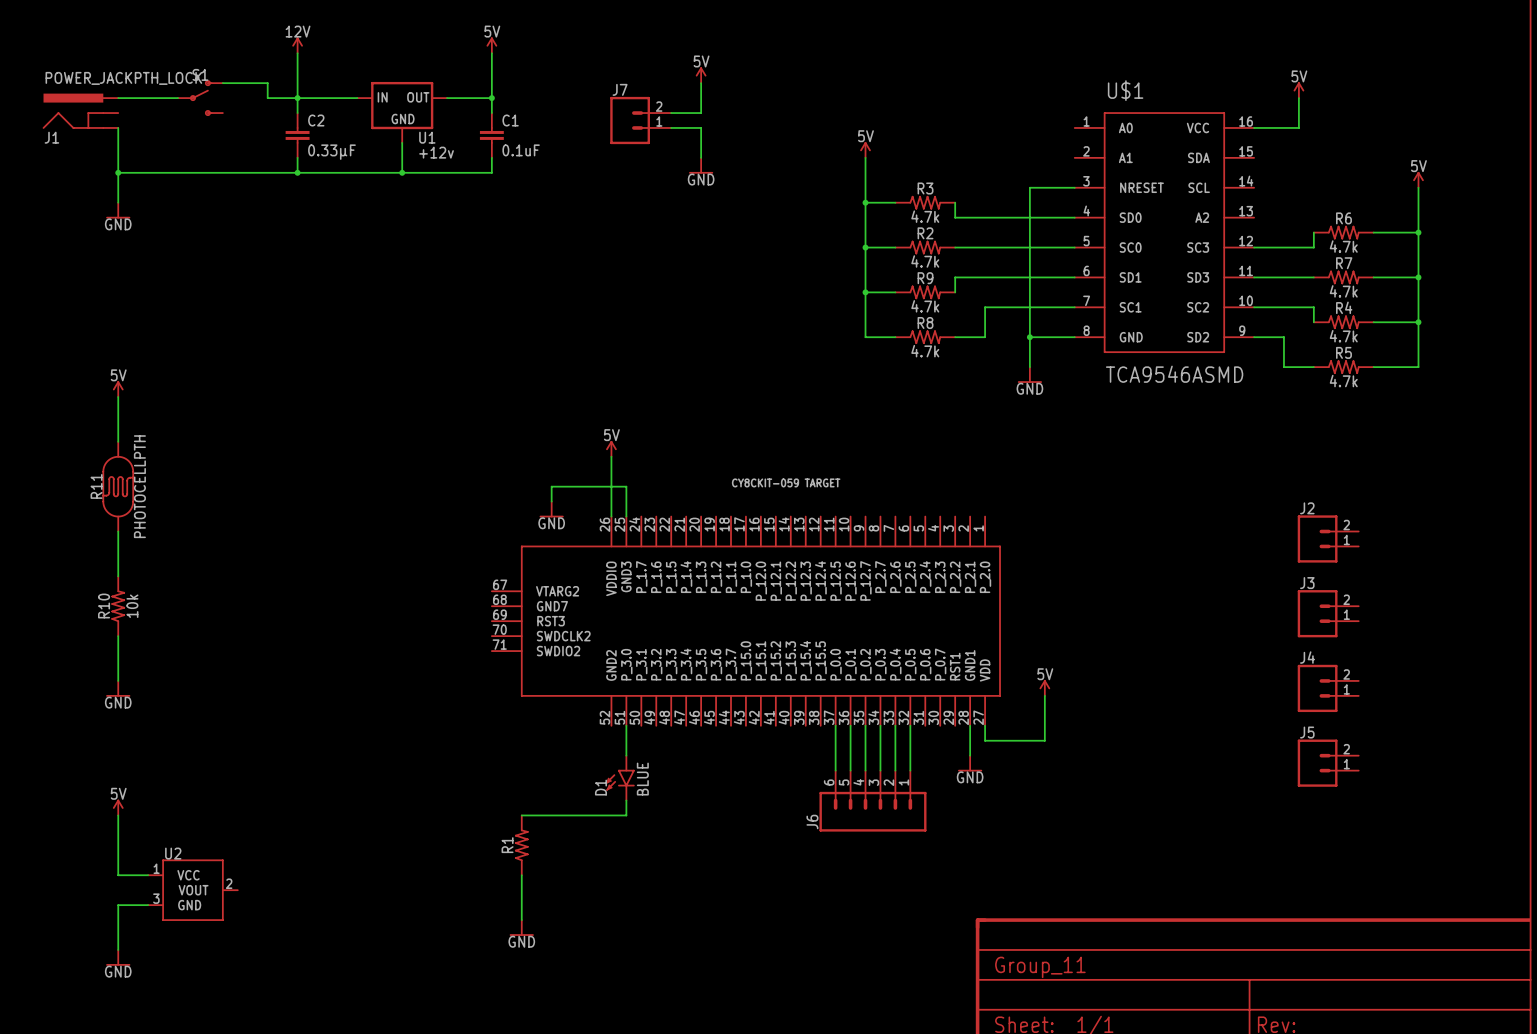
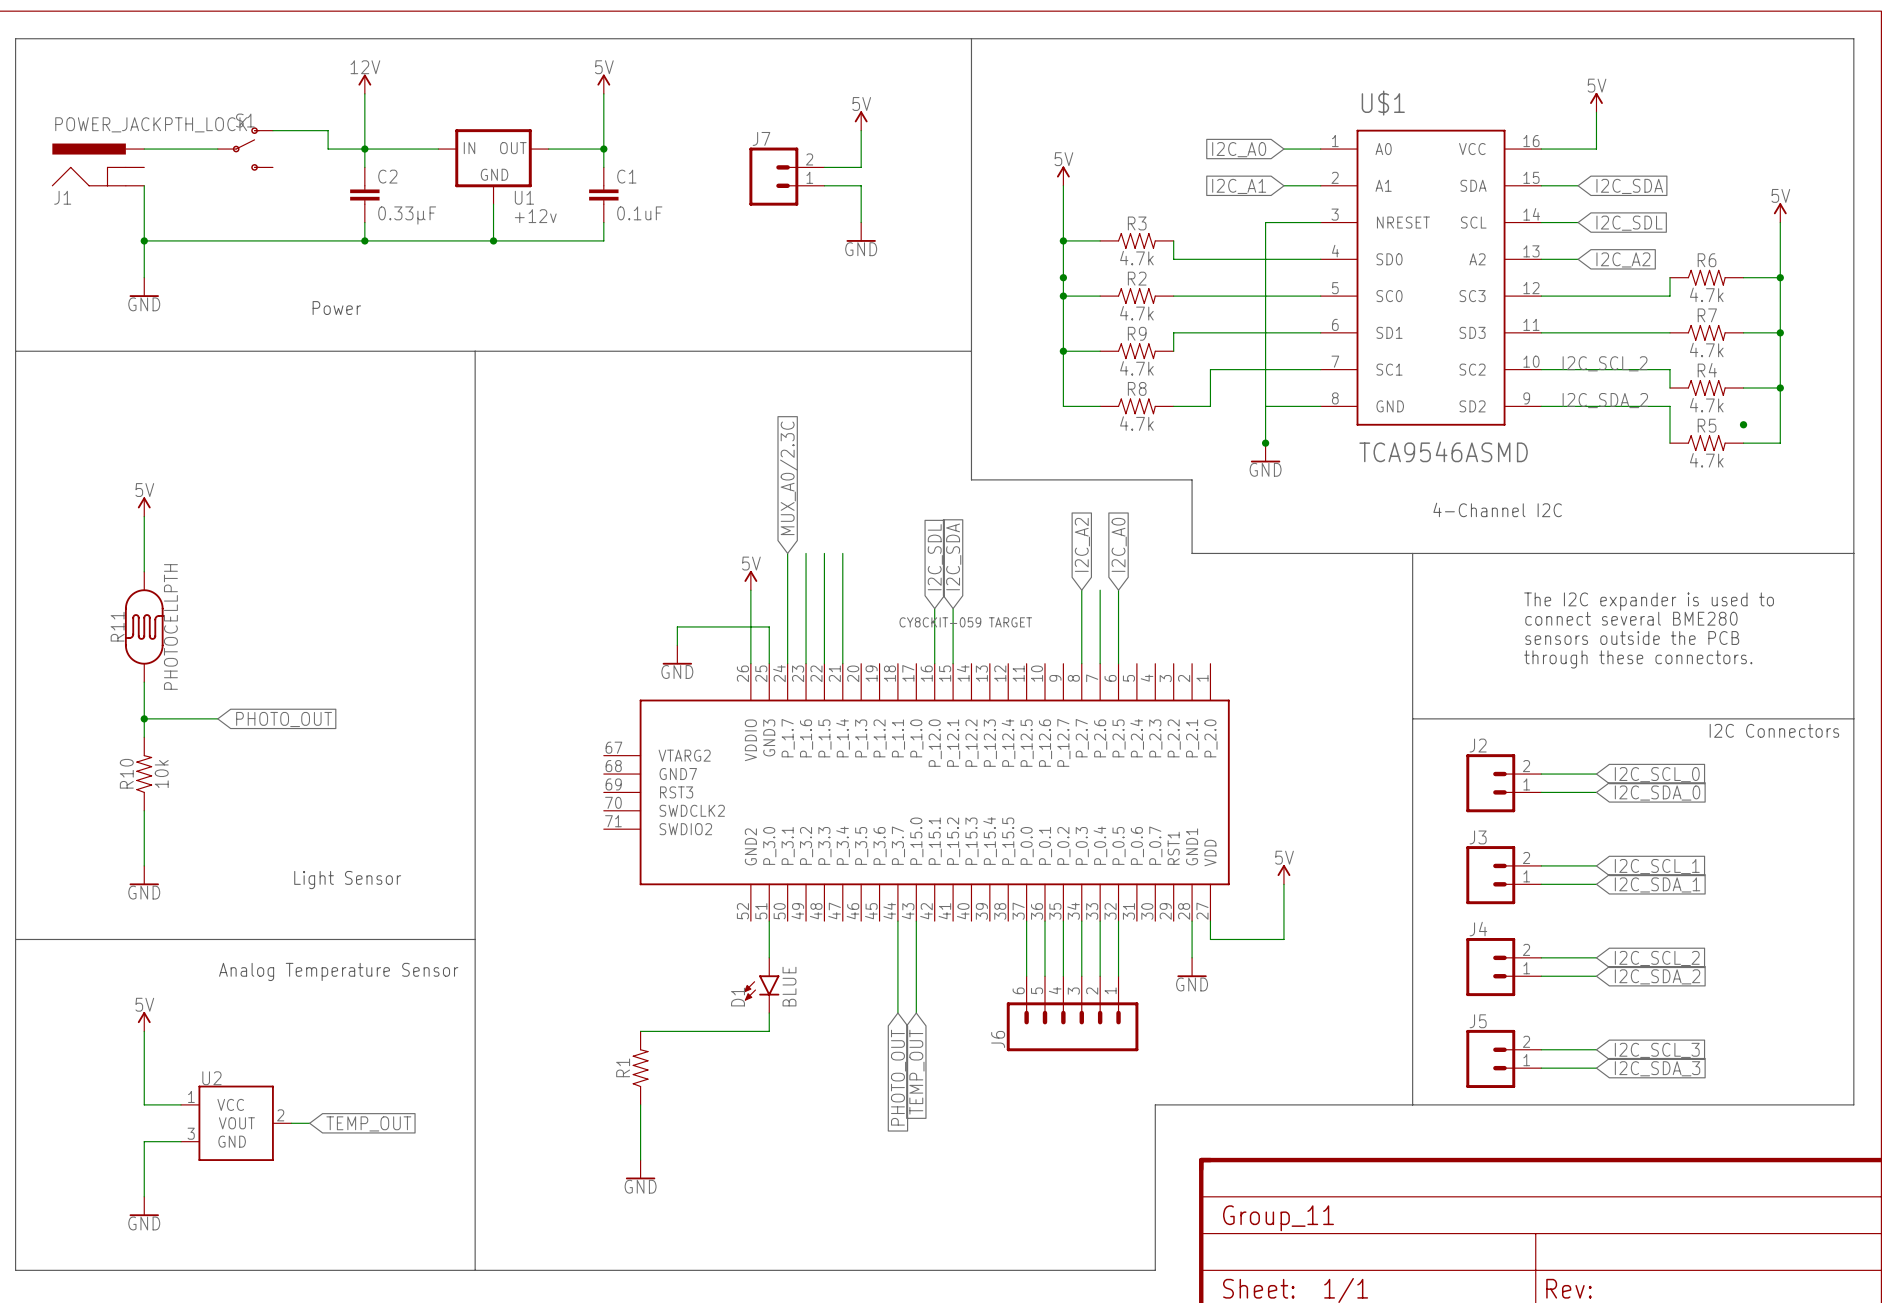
line: none -> (15, 38) (15, 1270) (1155, 1270) (1155, 1104) (1853, 1104) (1853, 38) (15, 38)
line: none -> (971, 38) (971, 479) (1192, 479) (1192, 553) (1853, 553)
wire: none -> (1596, 112) (1596, 149) (1541, 149)
power symbol position: 5V (1298, 90) -> 5V (1596, 102)
global label: none -> I2C_A0 (1239, 149)
wire: none -> (1283, 149) (1320, 149)
wire: (1298, 98) (1298, 127) (1283, 127) -> none
wire: none -> (1283, 185) (1320, 185)
global label: none -> I2C_A1 (1239, 186)
global label: none -> I2C_SDA (1629, 186)
power symbol position: 5V (865, 150) -> 5V (1063, 176)
wire: none -> (1320, 222) (1265, 222) (1265, 259) (1173, 259) (1173, 240)
wire: none -> (1541, 222) (1578, 222)
wire: none -> (1780, 222) (1780, 443) (1743, 443)
global label: none -> I2C_SDL (1629, 223)
junction: none -> (1063, 240)
power symbol position: 5V (1418, 179) -> 5V (1780, 212)
wire: none -> (1541, 259) (1578, 259)
wire: (1418, 187) (1418, 367) (1373, 367) -> none
global label: none -> I2C_A2 (1623, 259)
wire: (865, 202) (895, 202) -> (1063, 296) (1100, 296)
R3 position: (925, 202) -> (1136, 240)
wire: (955, 202) (955, 217) -> (1173, 332) (1173, 351)
wire: none -> (1670, 277) (1670, 296) (1541, 296)
wire: none -> (1743, 277) (1780, 277)
junction: none -> (1780, 277)
junction: none -> (1063, 296)
text: none -> Power (336, 308)
U$1 position: (1164, 232) -> (1431, 277)
wire: (1313, 232) (1313, 247) -> (1670, 332) (1614, 332)
R6 position: (1343, 232) -> (1706, 277)
wire: (1373, 232) (1418, 232) -> none
junction: (1418, 232) -> none
wire: (865, 247) (895, 247) -> (1063, 351) (1100, 351)
junction: (865, 247) -> none
R2 position: (925, 247) -> (1136, 296)
wire: none -> (1743, 332) (1780, 332)
junction: none -> (1780, 332)
line: none -> (15, 351) (971, 351)
line: none -> (475, 351) (475, 1270)
junction: none -> (1063, 351)
label: none -> I2C_SCL_2 (1605, 363)
wire: (985, 277) (955, 277) (955, 292) -> (1210, 369) (1210, 406) (1173, 406)
wire: none -> (1614, 369) (1670, 369) (1670, 388)
R7 position: (1343, 277) -> (1706, 332)
wire: (1373, 277) (1418, 277) -> none
junction: (1418, 277) -> none
wire: (865, 292) (895, 292) -> (1063, 240) (1100, 240)
junction: (865, 292) -> none
R9 position: (925, 292) -> (1136, 351)
wire: none -> (1743, 388) (1780, 388)
junction: none -> (1780, 388)
label: none -> I2C_SDA_2 (1605, 400)
wire: (865, 307) (865, 337) (895, 337) -> (1063, 406) (1100, 406)
wire: (1029, 307) (985, 307) (985, 337) (955, 337) -> none
wire: (1313, 307) (1313, 322) -> (1614, 406) (1670, 406) (1670, 443)
R4 position: (1343, 322) -> (1706, 388)
wire: (1373, 322) (1418, 322) -> none
R8 position: (925, 337) -> (1136, 406)
wire: (1074, 337) (1029, 337) (1029, 367) -> none
wire: (1254, 337) (1283, 337) (1283, 367) (1313, 367) -> none
global label: none -> MUX_A0/2.3C (788, 478)
R5 position: (1343, 367) -> (1706, 443)
power symbol position: GND (1029, 374) -> GND (1265, 452)
text: none -> 4-Channel I2C (1497, 509)
global label: none -> I2C_A2 (1082, 544)
global label: none -> I2C_A0 (1119, 544)
wire: none -> (787, 553) (787, 663)
wire: none -> (806, 553) (806, 663)
wire: none -> (824, 553) (824, 663)
wire: none -> (842, 553) (842, 663)
line: none -> (1412, 553) (1412, 1104)
global label: none -> I2C_SDL (935, 557)
global label: none -> I2C_SDA (953, 556)
wire: none -> (1081, 590) (1081, 663)
wire: none -> (1100, 590) (1100, 663)
wire: none -> (1118, 590) (1118, 663)
text: none -> The I2C expander is used to (1649, 601)
wire: none -> (934, 608) (934, 663)
wire: none -> (953, 608) (953, 663)
text: none -> connect several BME280 (1631, 618)
text: none -> sensors outside the PCB (1632, 638)
text: none -> through these connectors. (1638, 659)
J2 position: (1328, 538) -> (1503, 783)
wire: none -> (144, 718) (217, 718)
junction: none -> (144, 718)
global label: none -> PHOTO_OUT (284, 719)
line: none -> (1412, 718) (1853, 718)
text: none -> I2C Connectors (1774, 730)
wire: none -> (1541, 774) (1596, 774)
global label: none -> I2C_SCL_0 (1657, 774)
J3 position: (1328, 613) -> (1503, 875)
wire: none -> (1541, 792) (1596, 792)
global label: none -> I2C_SDA_0 (1657, 793)
wire: none -> (1541, 865) (1596, 865)
global label: none -> I2C_SCL_1 (1657, 866)
J4 position: (1328, 688) -> (1503, 967)
text: none -> Light Sensor (347, 880)
wire: none -> (1541, 884) (1596, 884)
global label: none -> I2C_SDA_1 (1657, 884)
wire: none -> (897, 921) (897, 1013)
wire: none -> (916, 921) (916, 1013)
line: none -> (15, 939) (475, 939)
wire: none -> (1541, 957) (1596, 957)
global label: none -> I2C_SCL_2 (1657, 958)
J5 position: (1328, 763) -> (1503, 1058)
text: none -> Analog Temperature Sensor (338, 971)
wire: none -> (1541, 976) (1596, 976)
global label: none -> I2C_SDA_2 (1657, 976)
wire: none -> (1541, 1049) (1596, 1049)
global label: none -> I2C_SCL_3 (1657, 1050)
wire: none -> (1541, 1068) (1596, 1068)
global label: none -> I2C_SDA_3 (1657, 1068)
global label: none -> TEMP_OUT (916, 1072)
global label: none -> PHOTO_OUT (898, 1077)
wire: none -> (291, 1123) (309, 1123)
global label: none -> TEMP_OUT (368, 1123)

